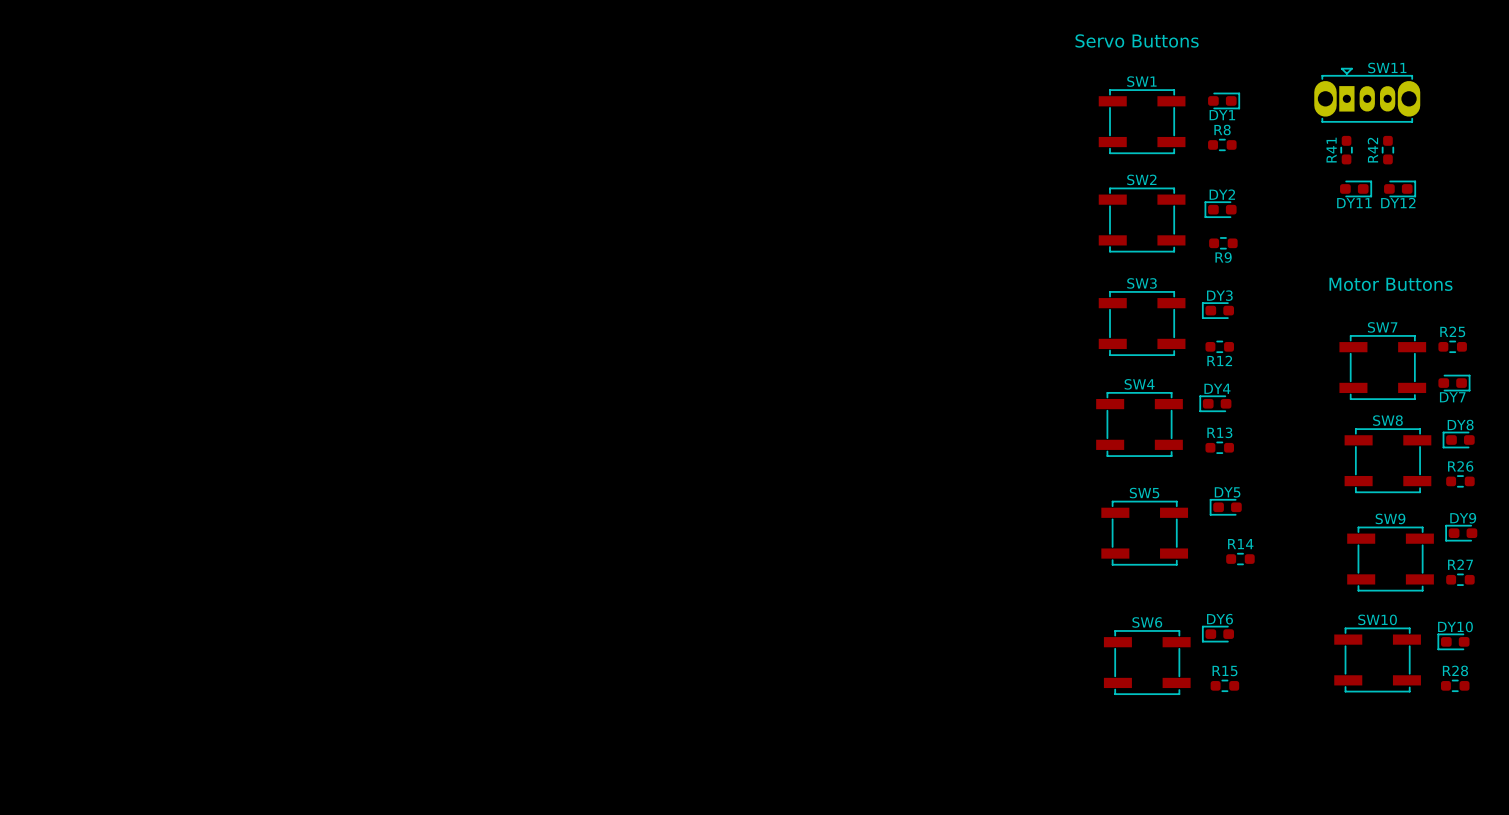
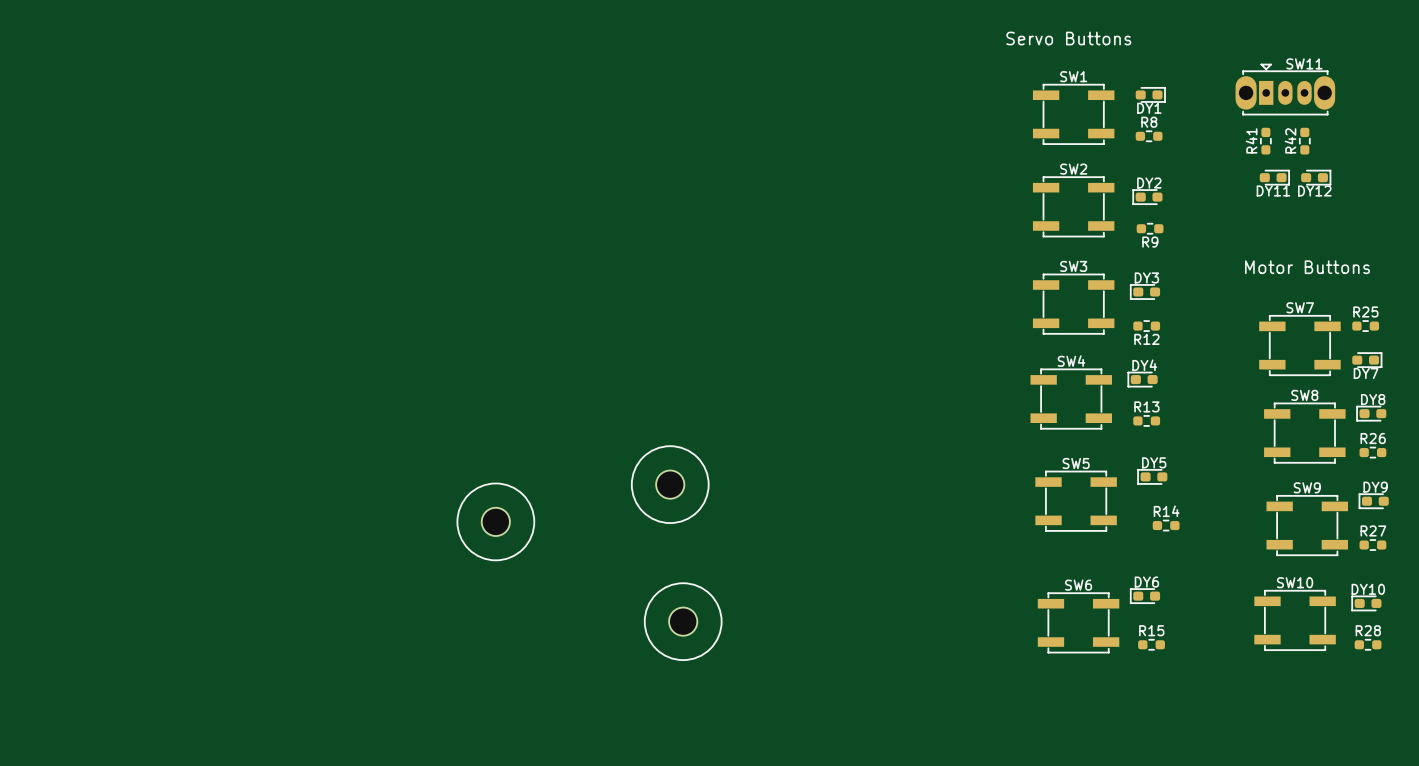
part: none -> (670, 484)
part: none -> (495, 521)
part: none -> (683, 621)

